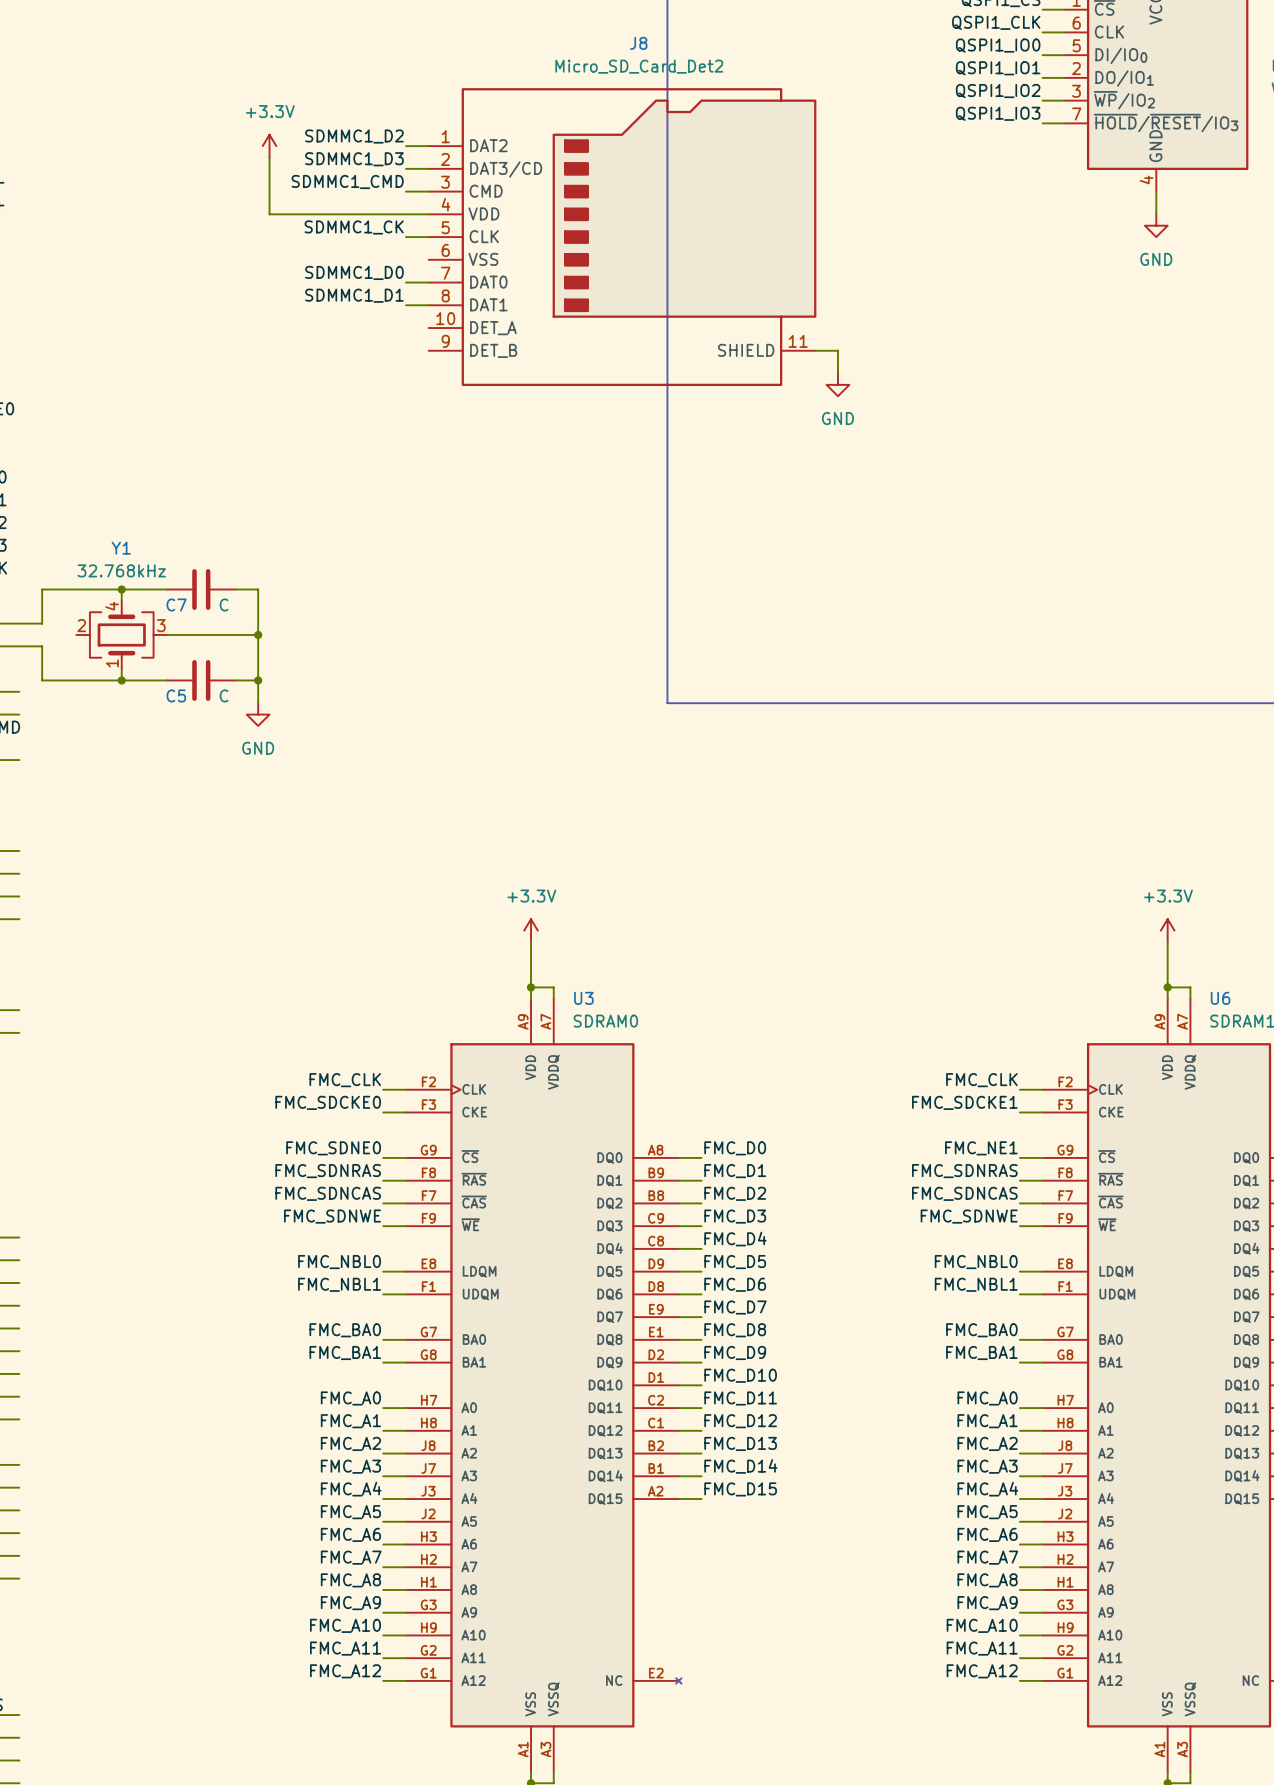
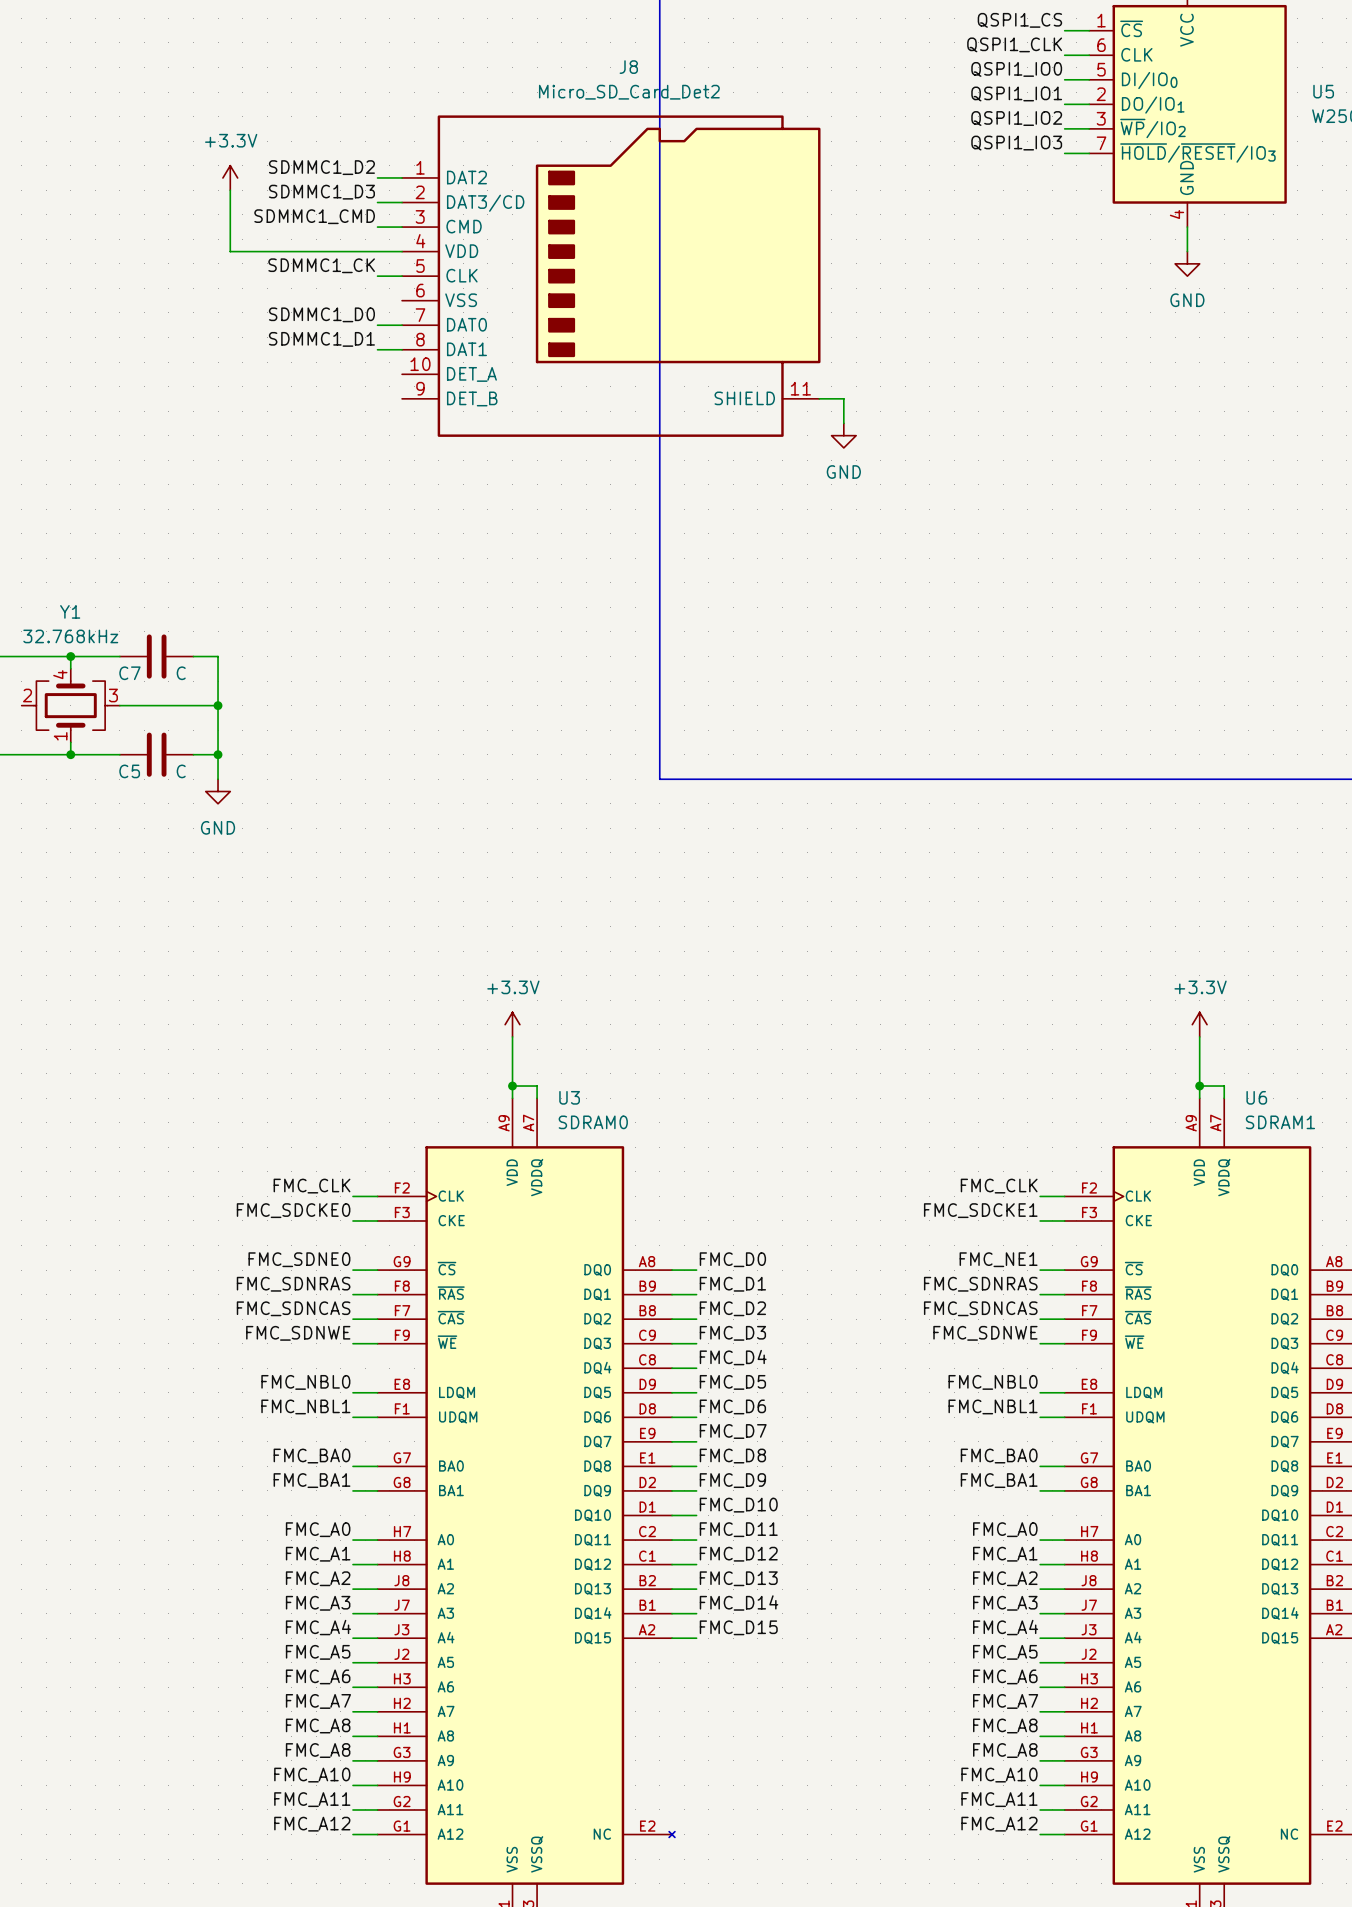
label: FMC_A9 (350, 1603) -> FMC_A8 (318, 1750)
label: FMC_A9 (987, 1603) -> FMC_A8 (1005, 1750)

